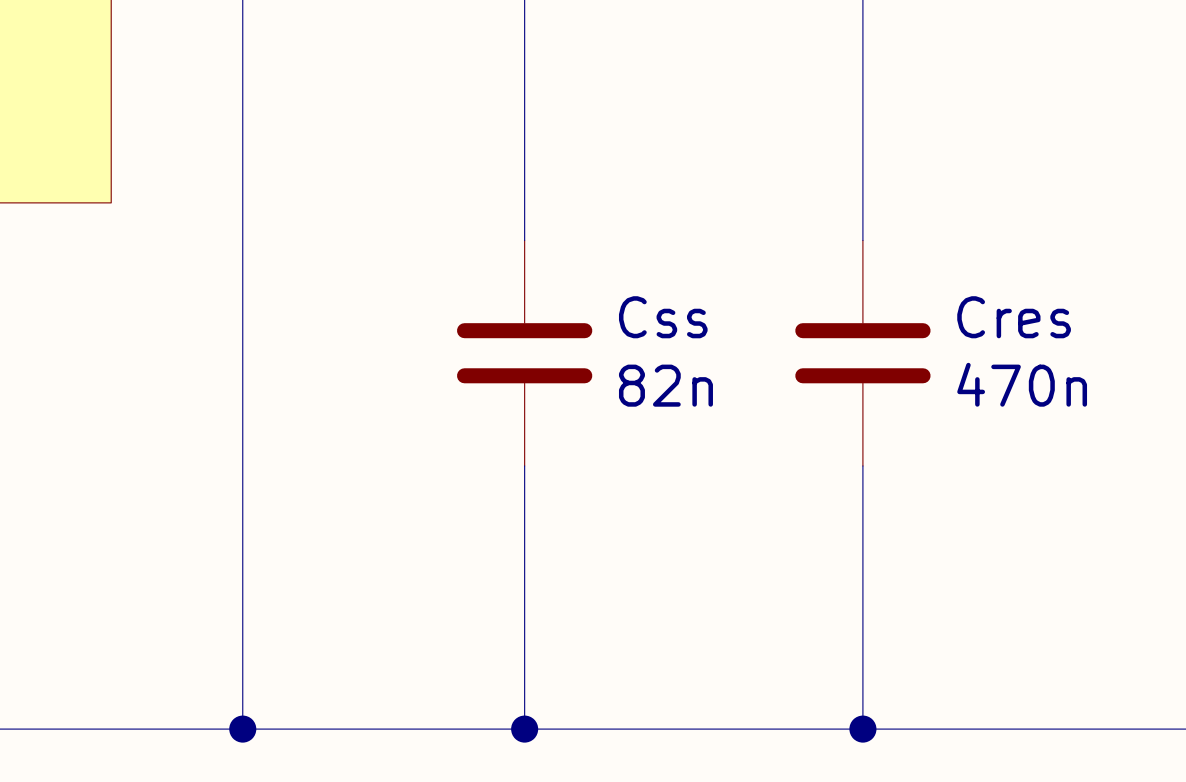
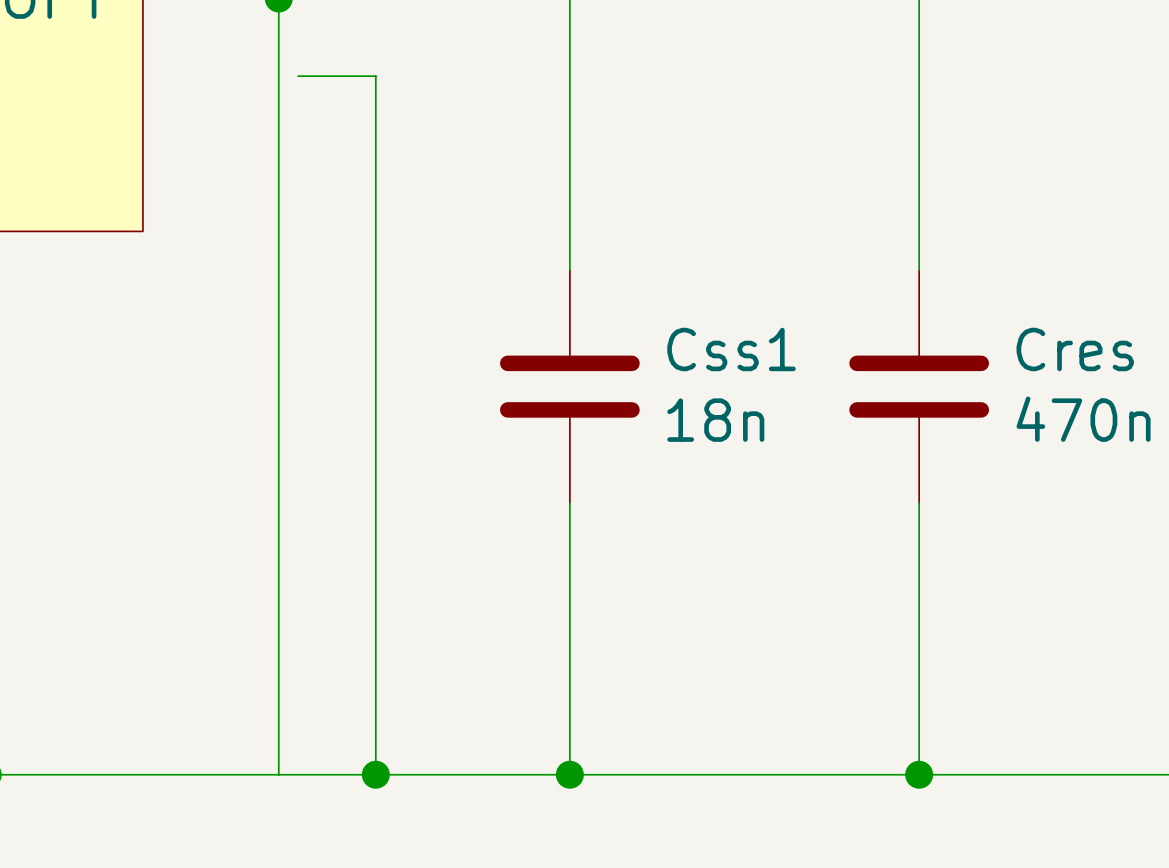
wire: none -> (298, 76) (375, 76) (375, 774)
Css name: Css (663, 317) -> Css1 (731, 349)
Css value: 82n (665, 385) -> 18n (715, 420)
junction position: (242, 729) -> (375, 774)

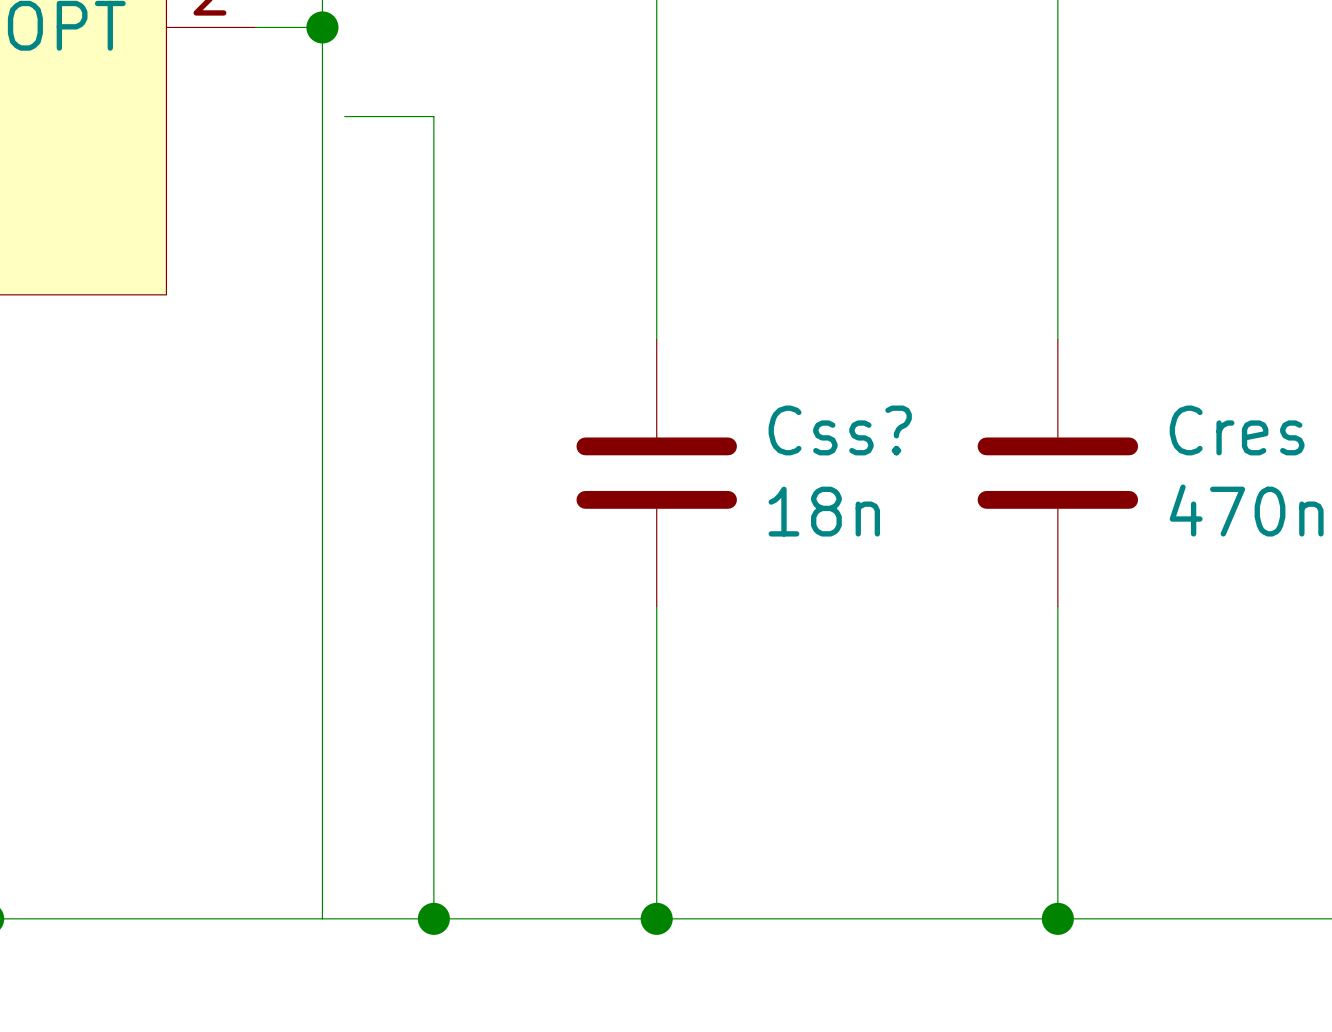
Css1 name: Css1 (731, 349) -> Css? (840, 430)

